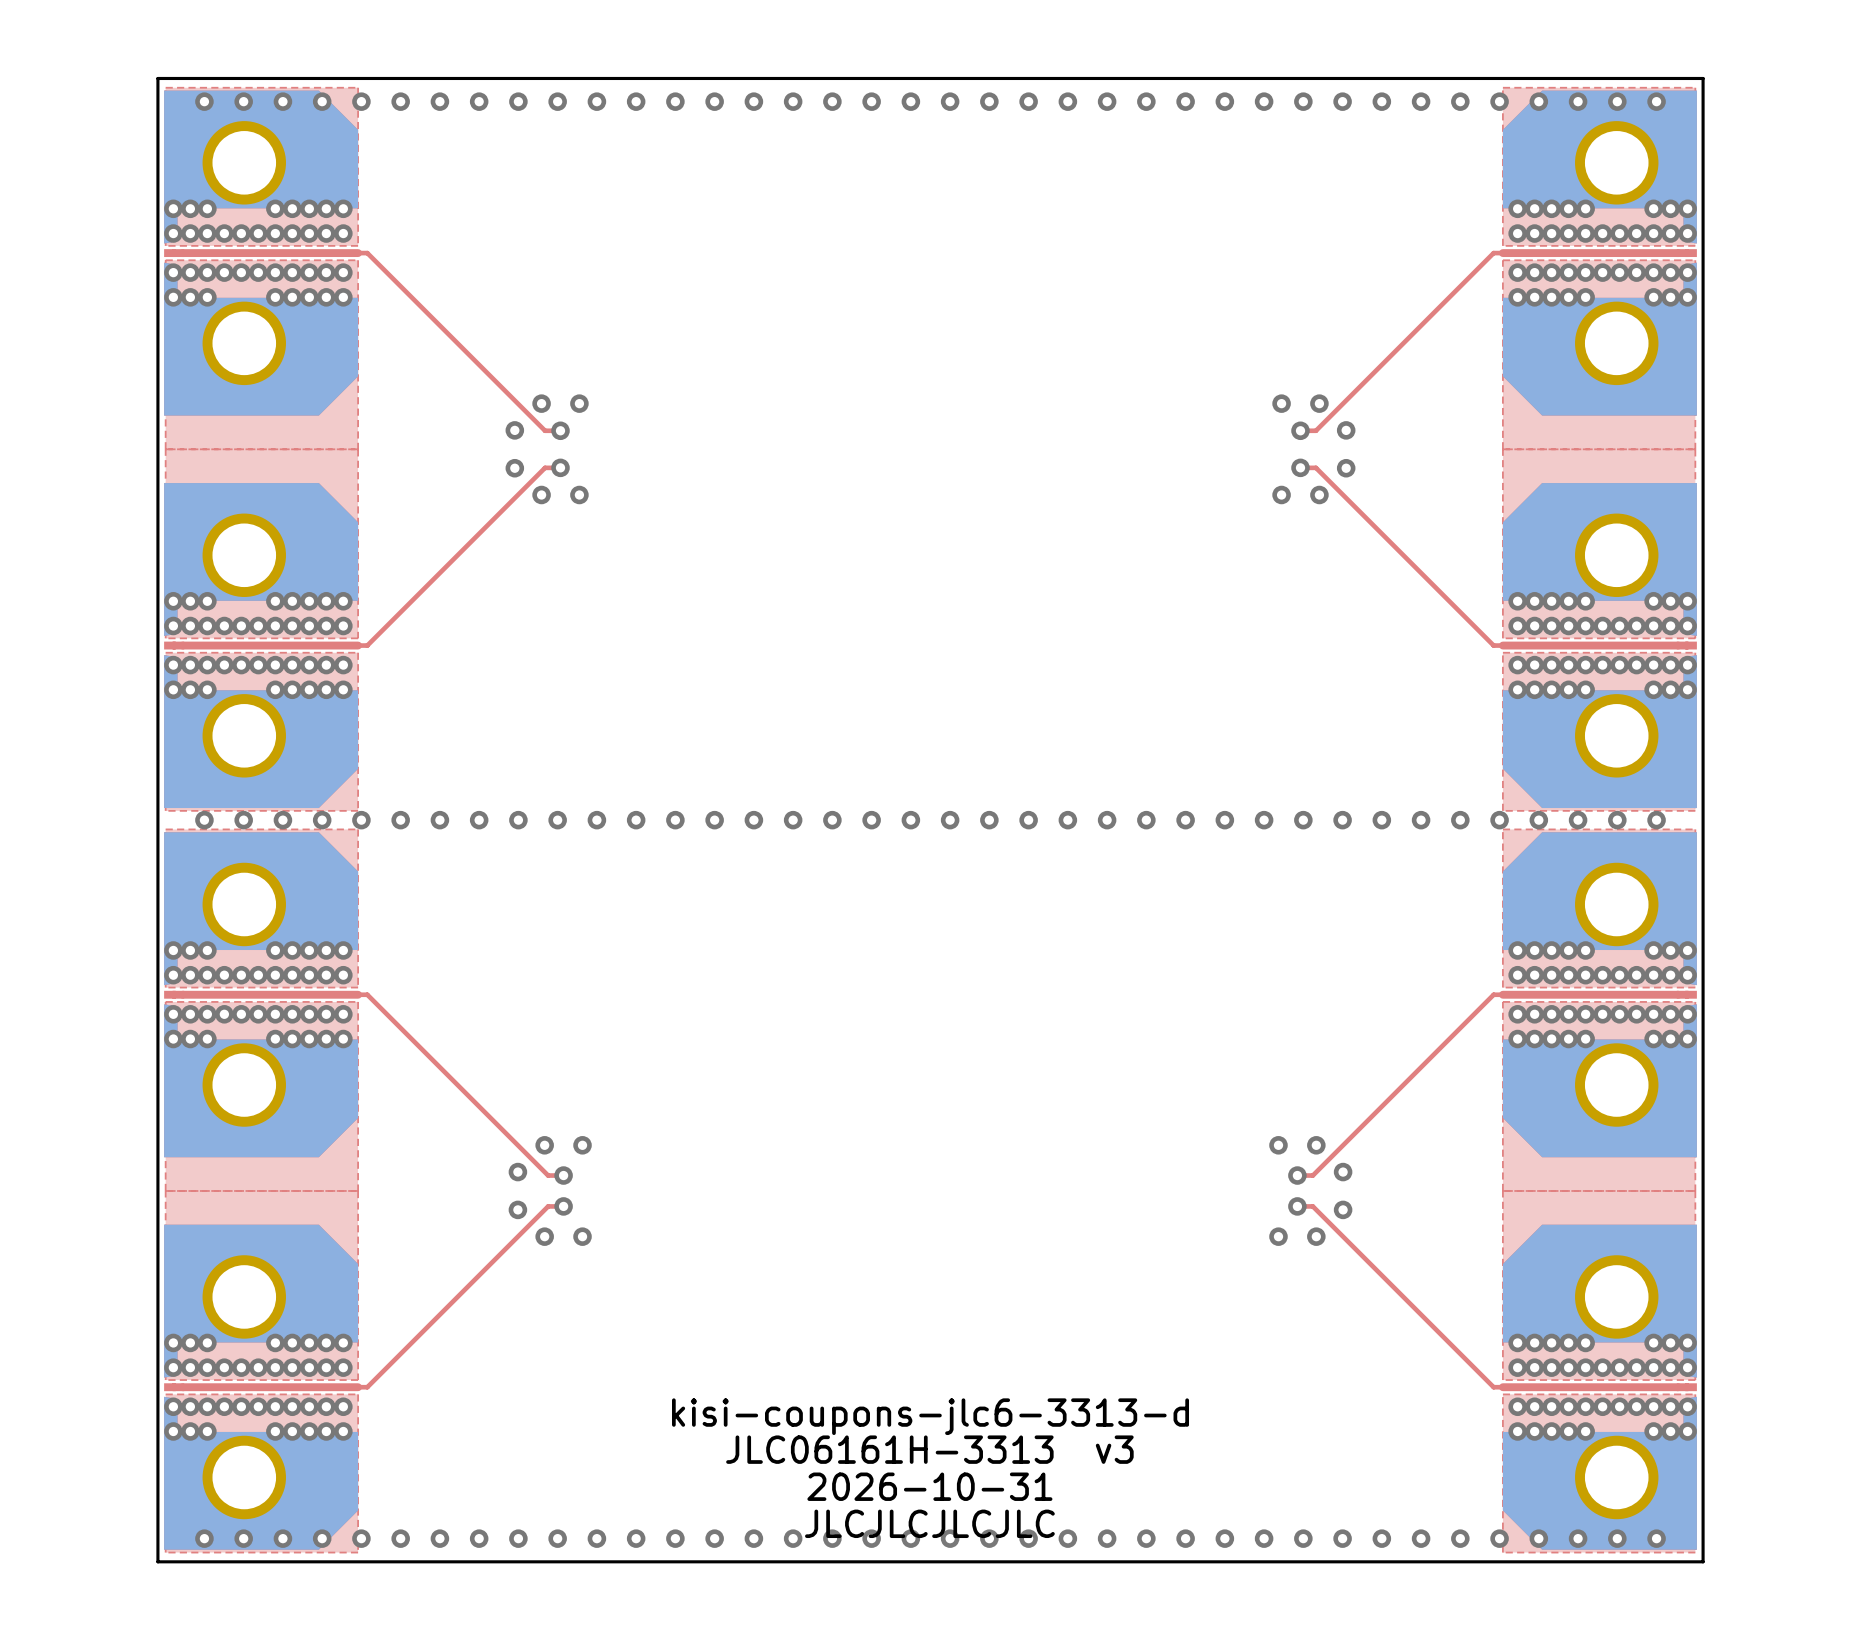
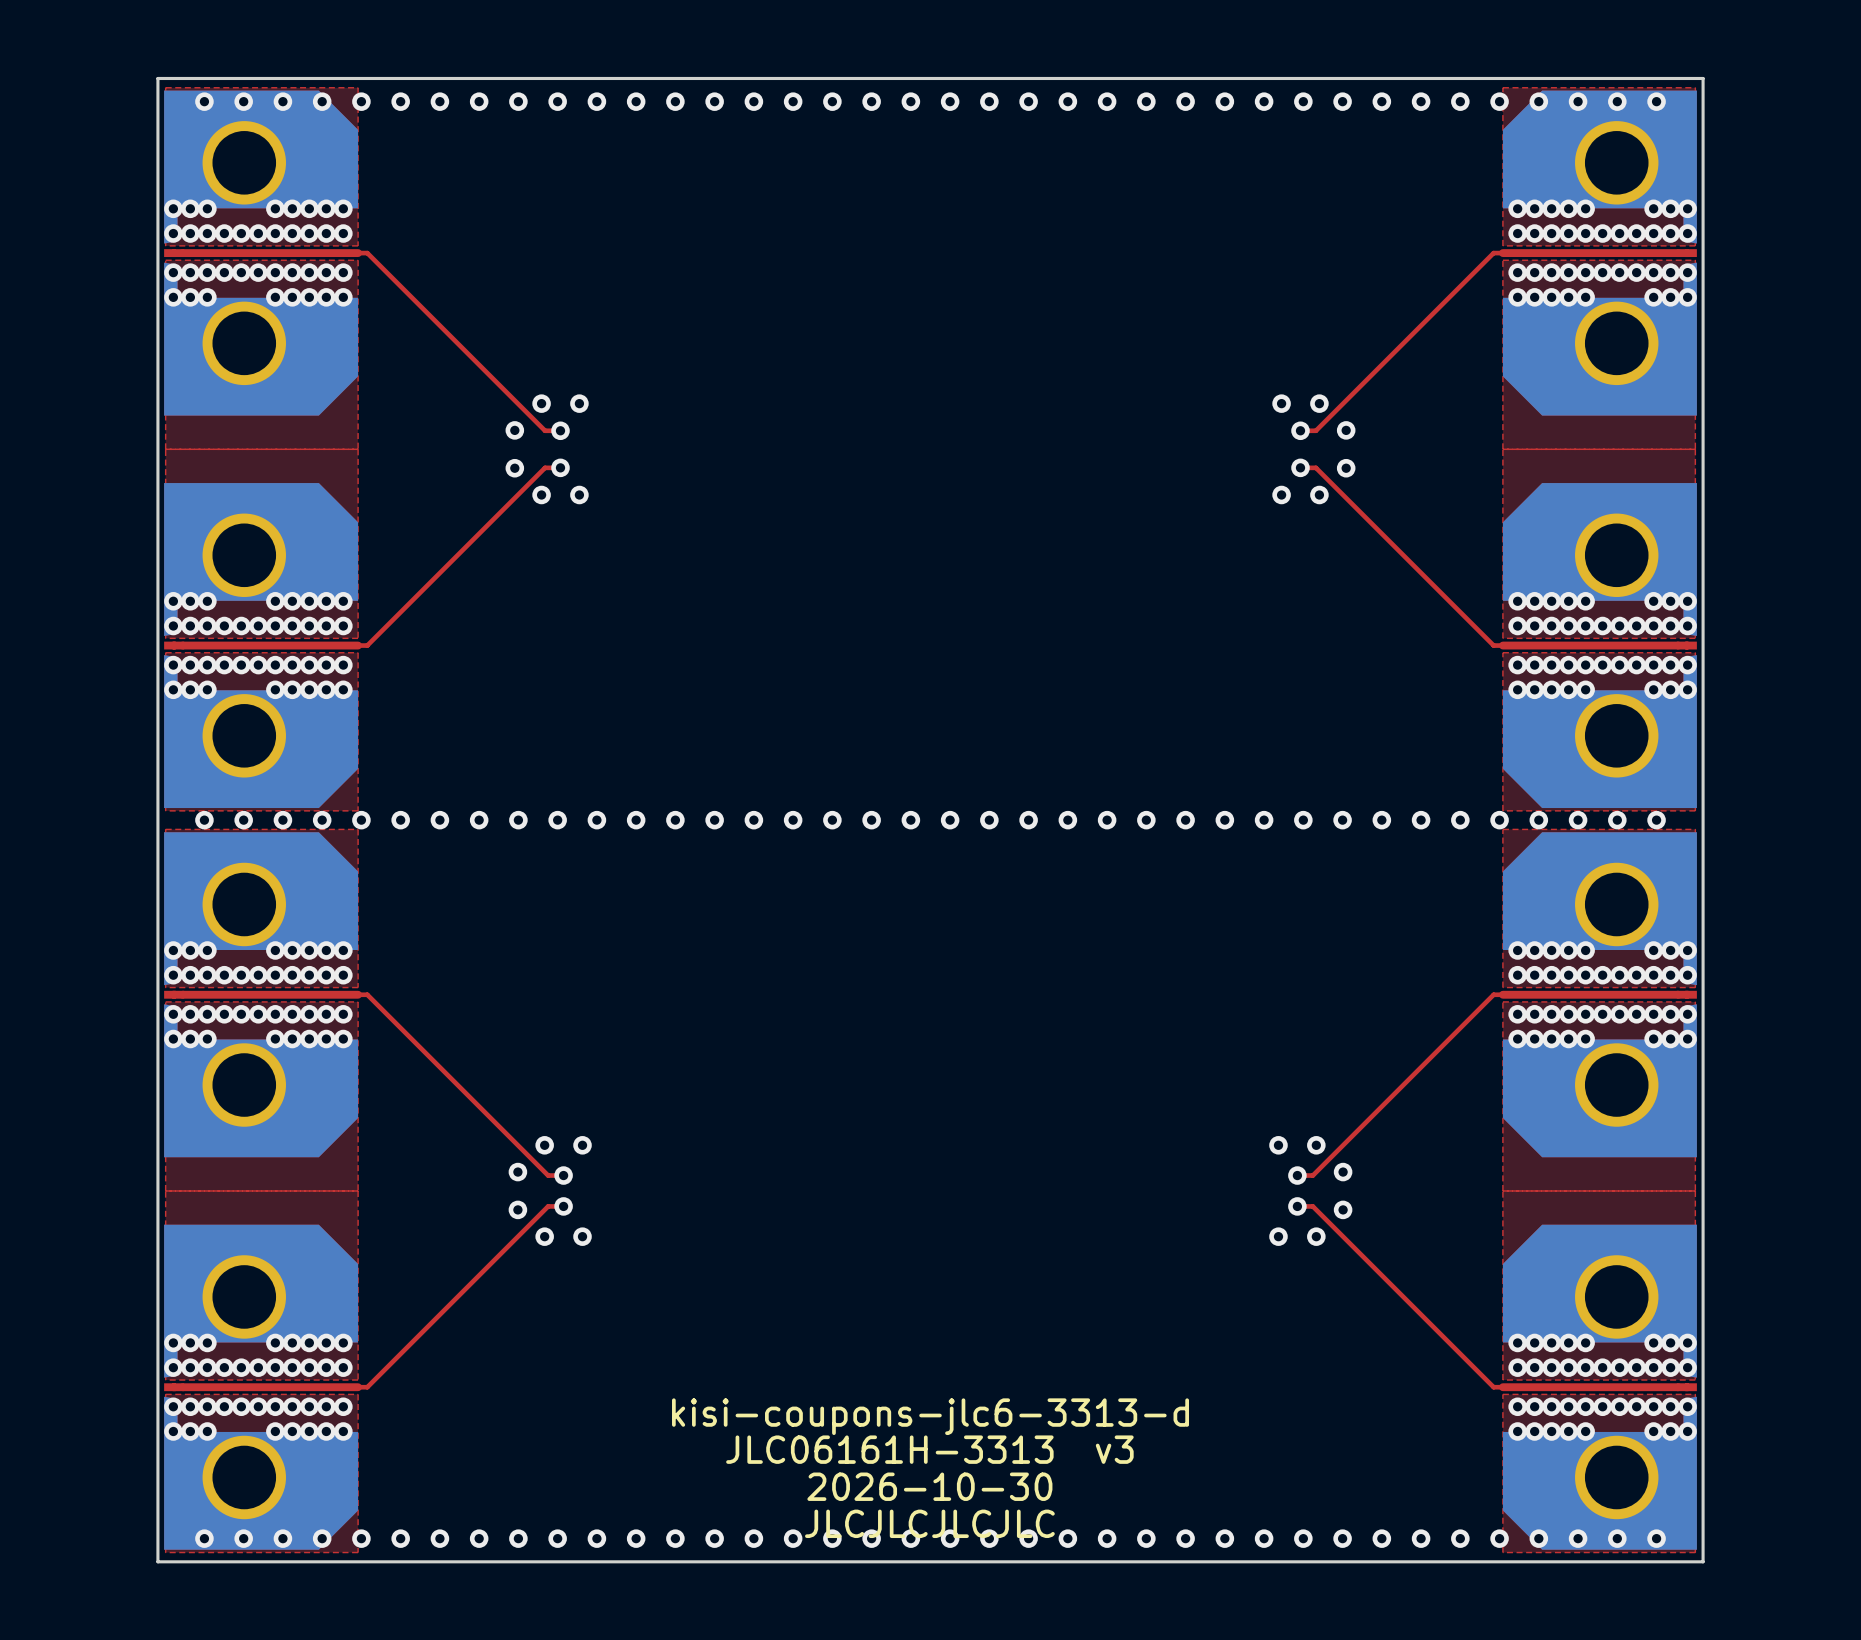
text: 2026-10-31 (929, 1486) -> 2026-10-30 (929, 1486)

